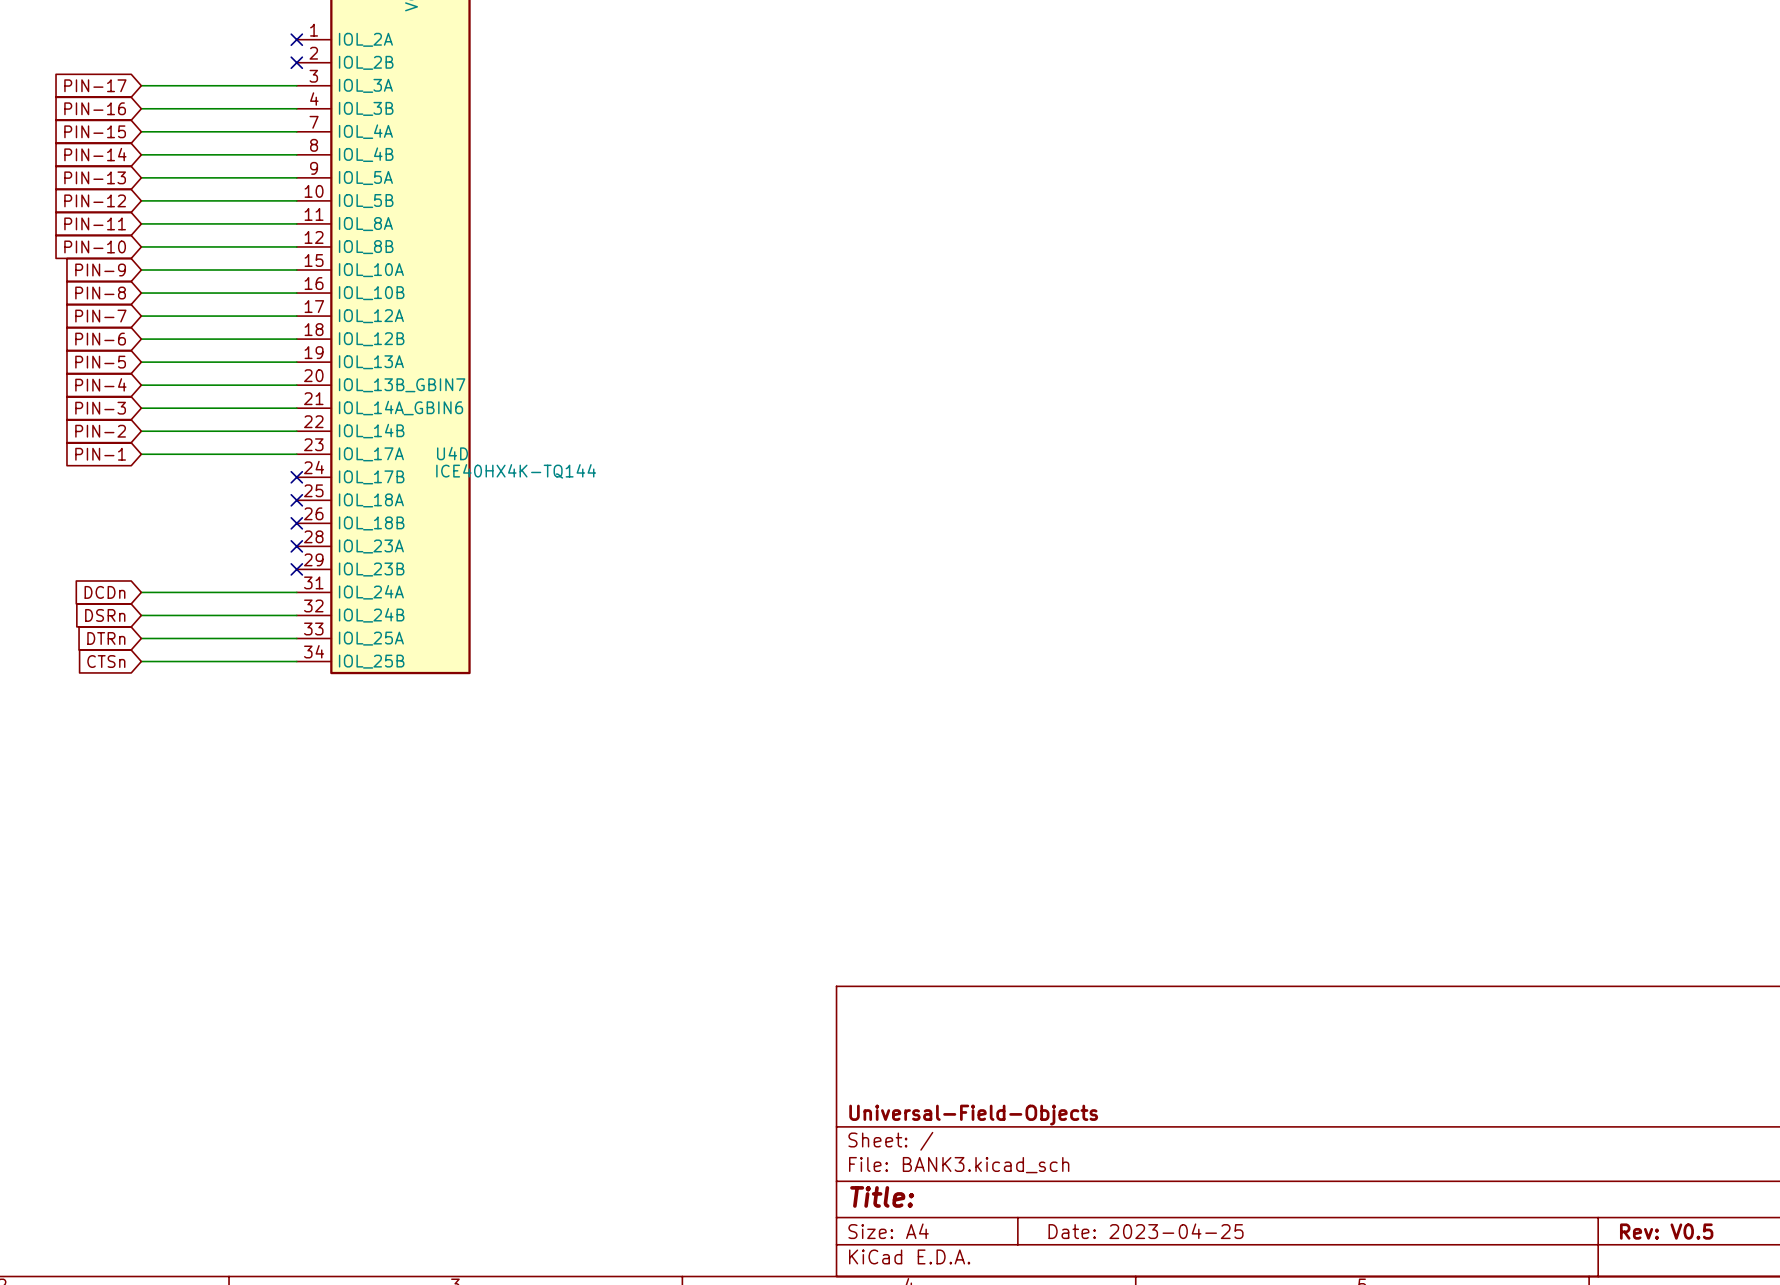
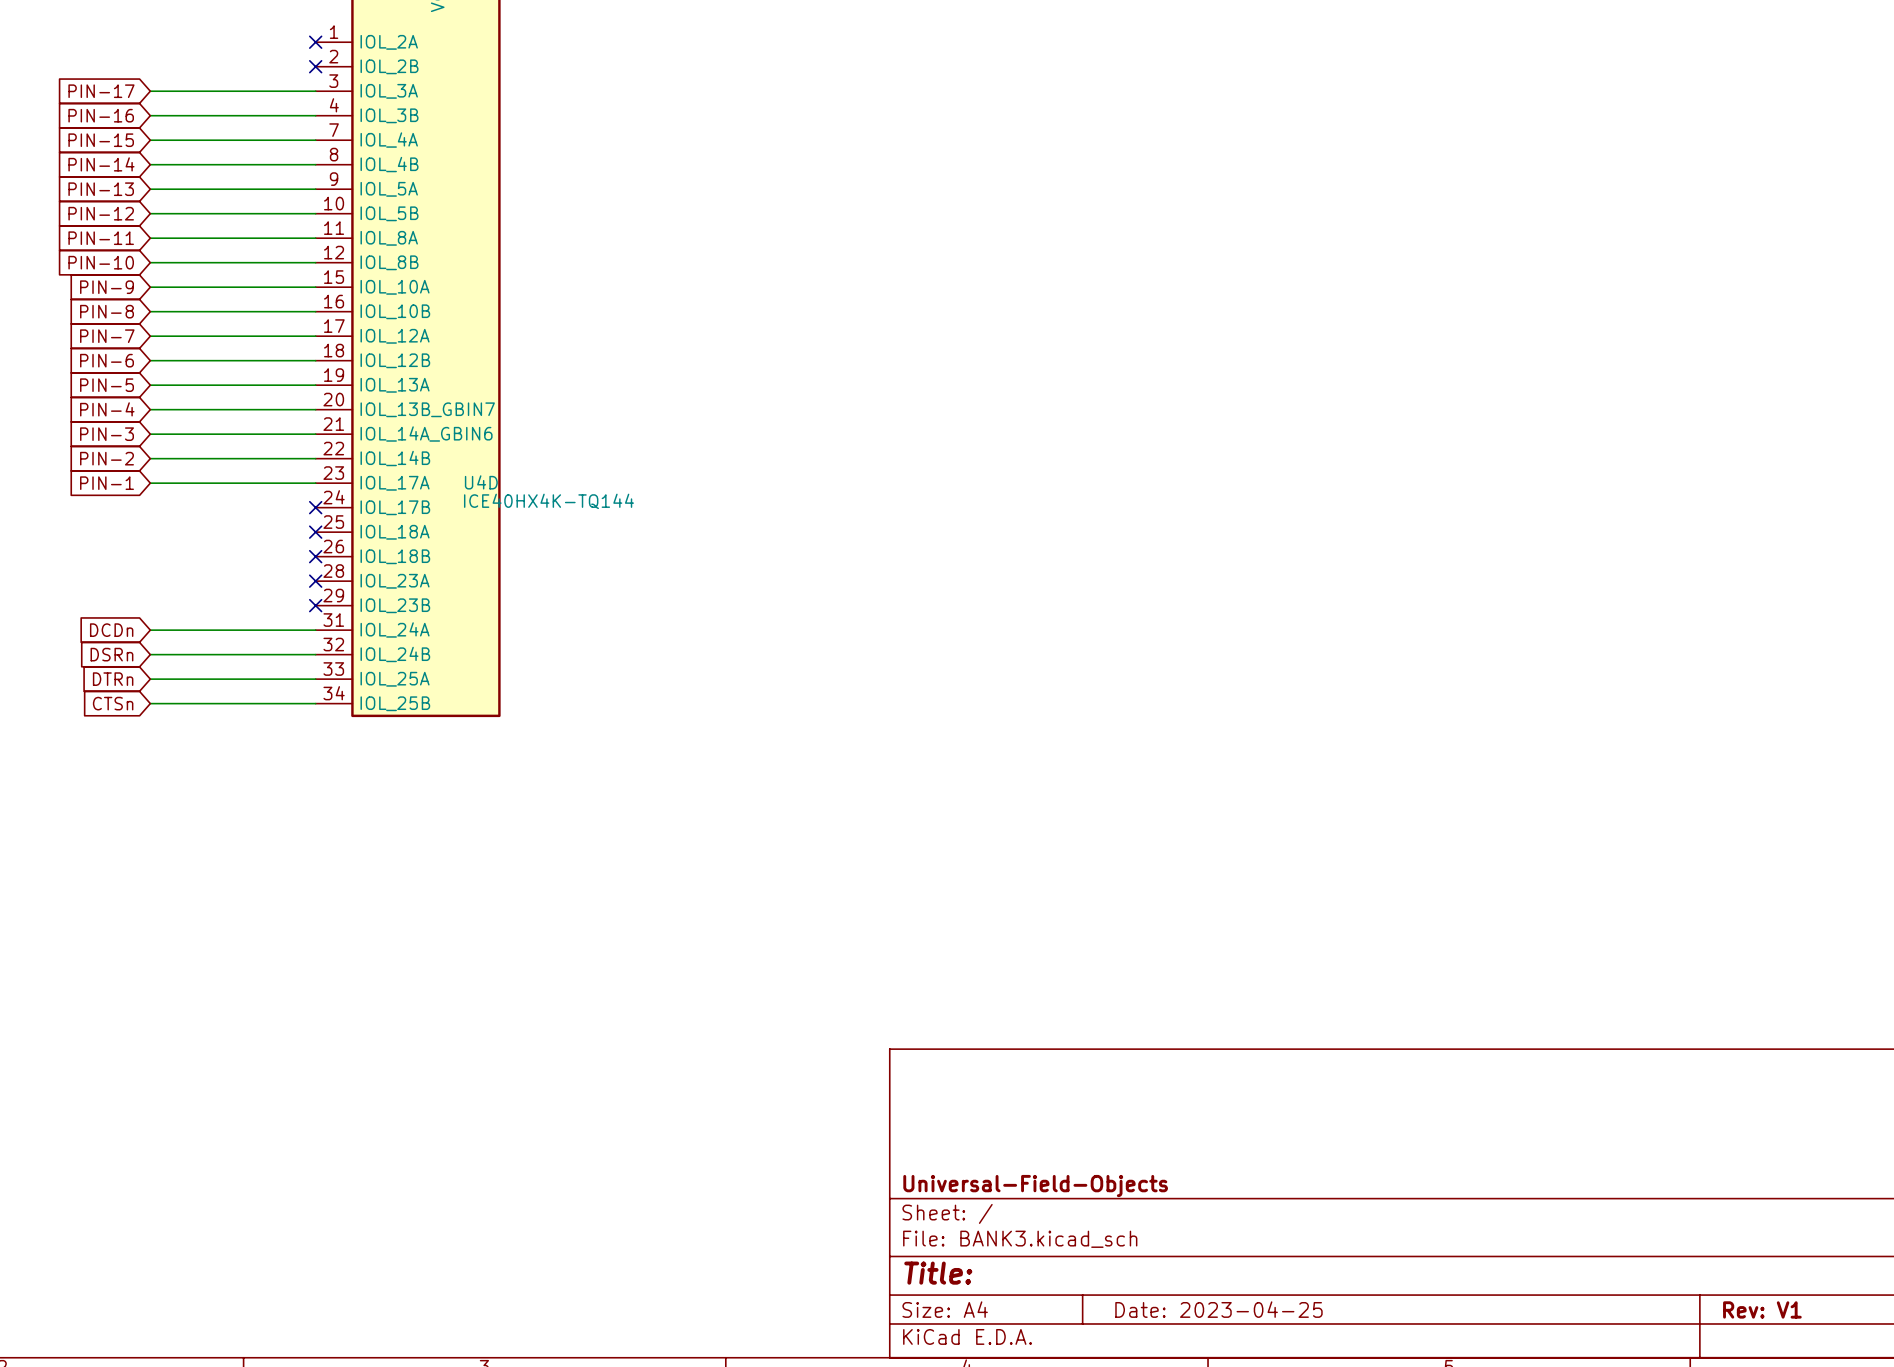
title block: Rev: V0.5 (1666, 1231) -> Rev: V1 (1762, 1309)

